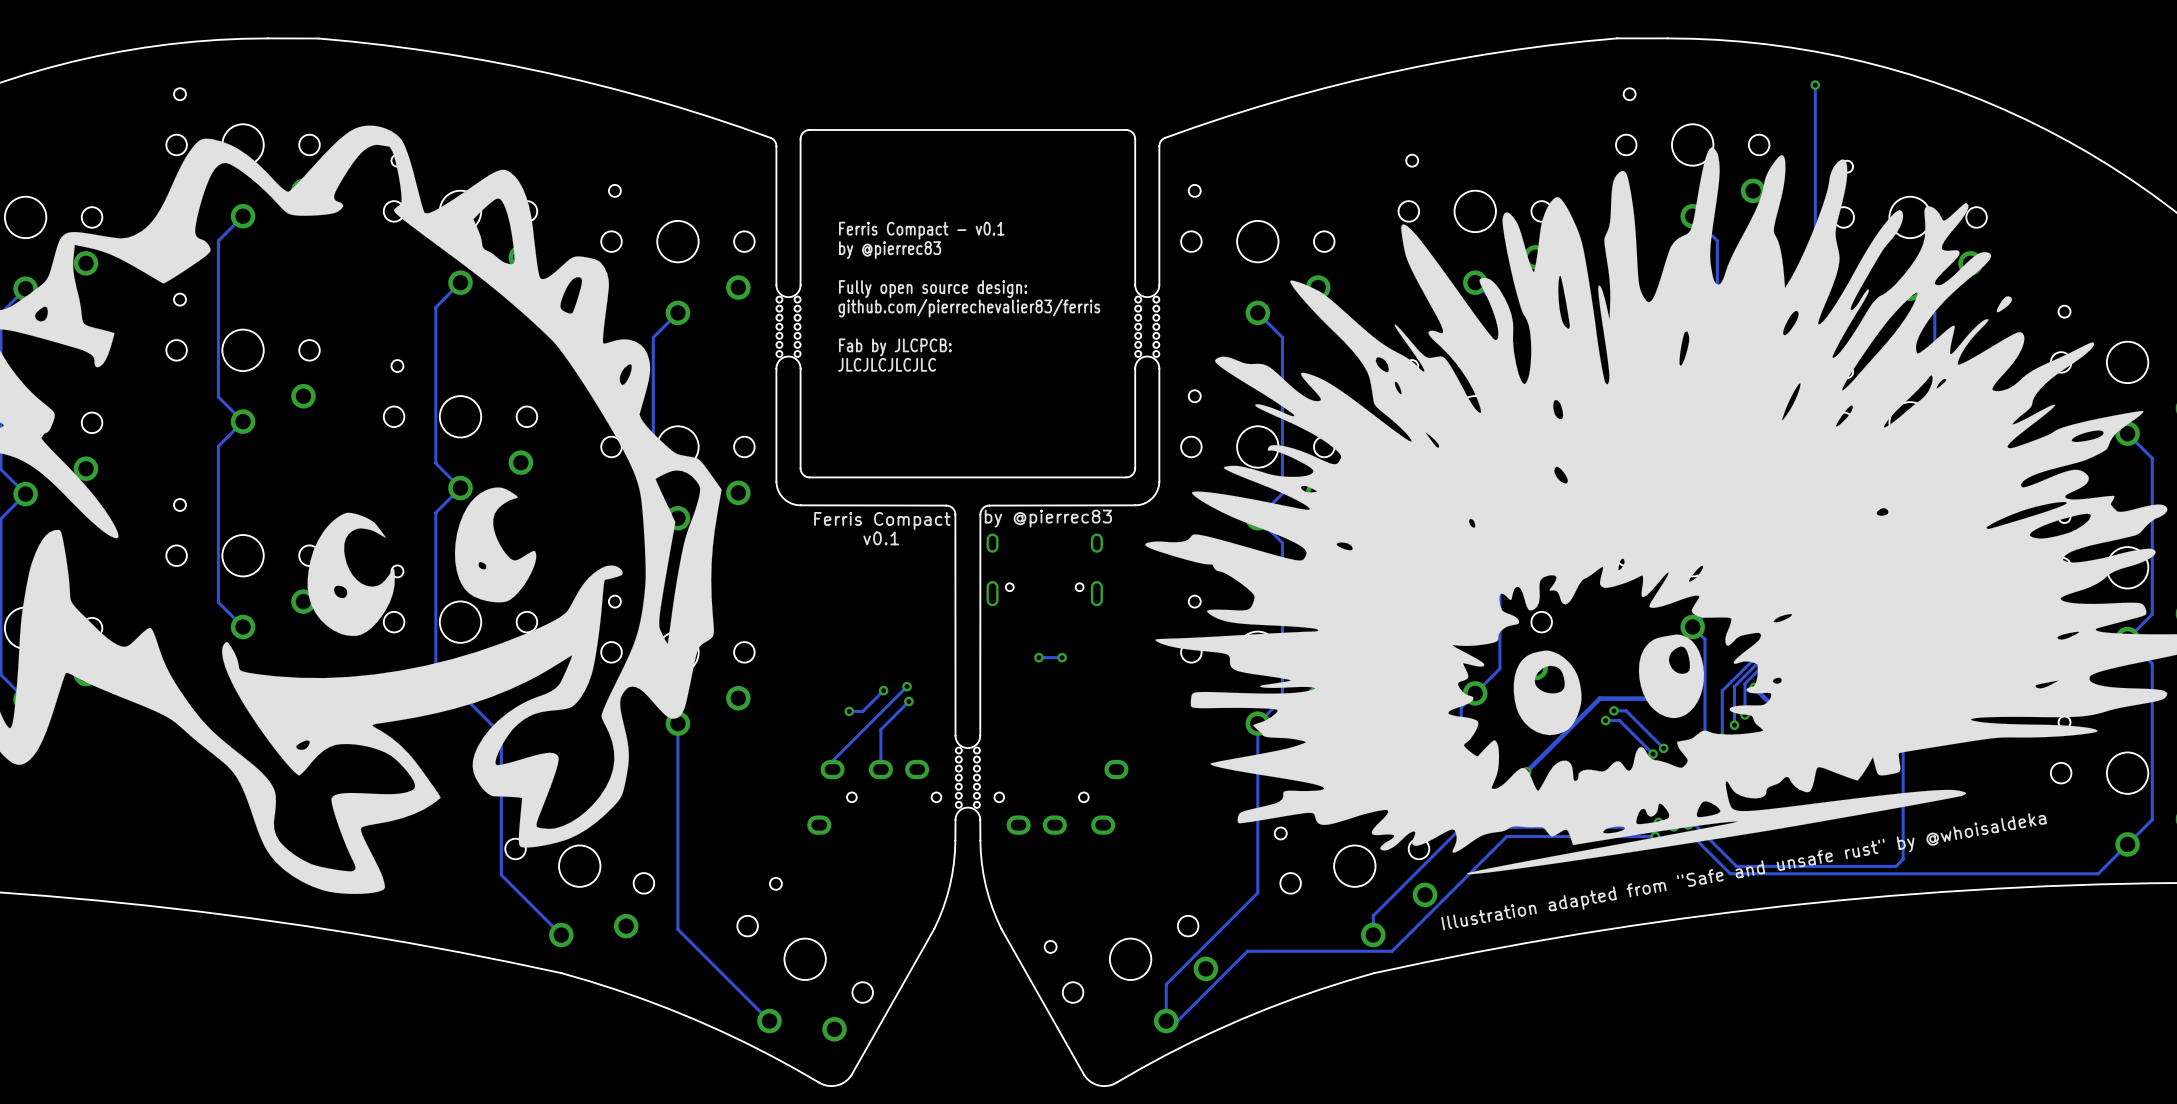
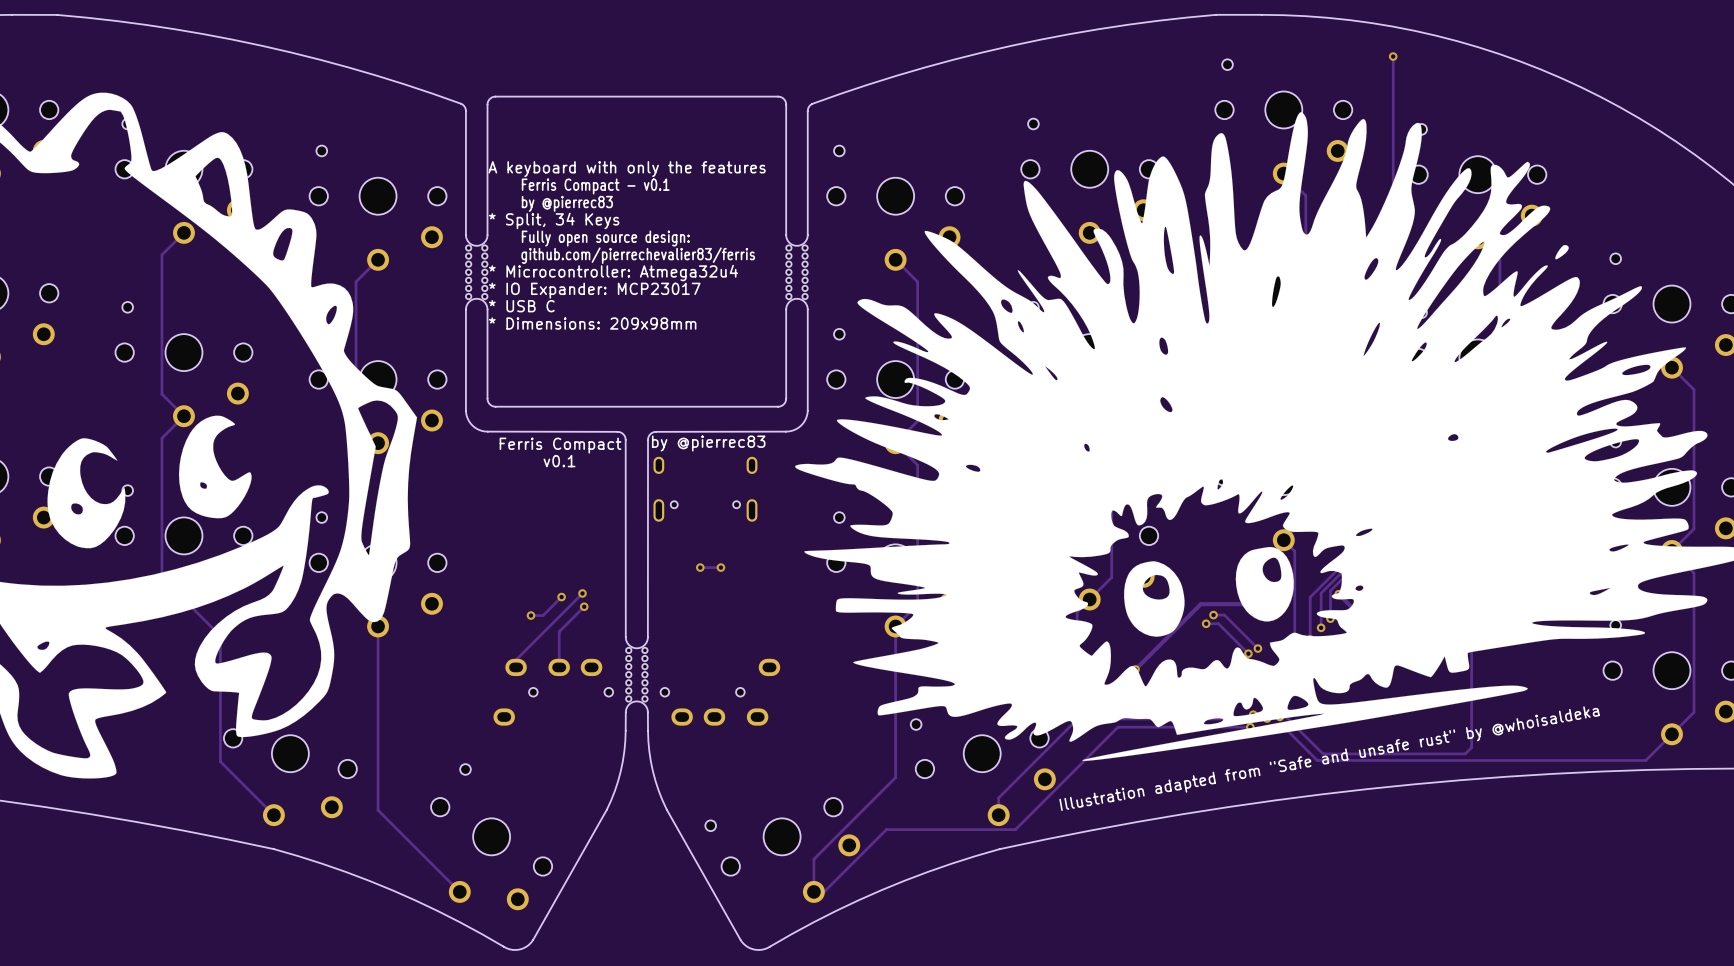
text: none -> A keyboard with only the features (627, 169)
text: none -> * Split, 34 Keys (554, 220)
text: none -> * Microcontroller: Atmega32u4 (613, 273)
text: Fab by JLCPCB: (895, 347) -> none
text: none -> * IO Expander: MCP23017 (594, 290)
text: none -> * USB C (521, 306)
text: JLCJLCJLCJLC (887, 364) -> none
text: none -> * Dimensions: 209x98mm (592, 323)

